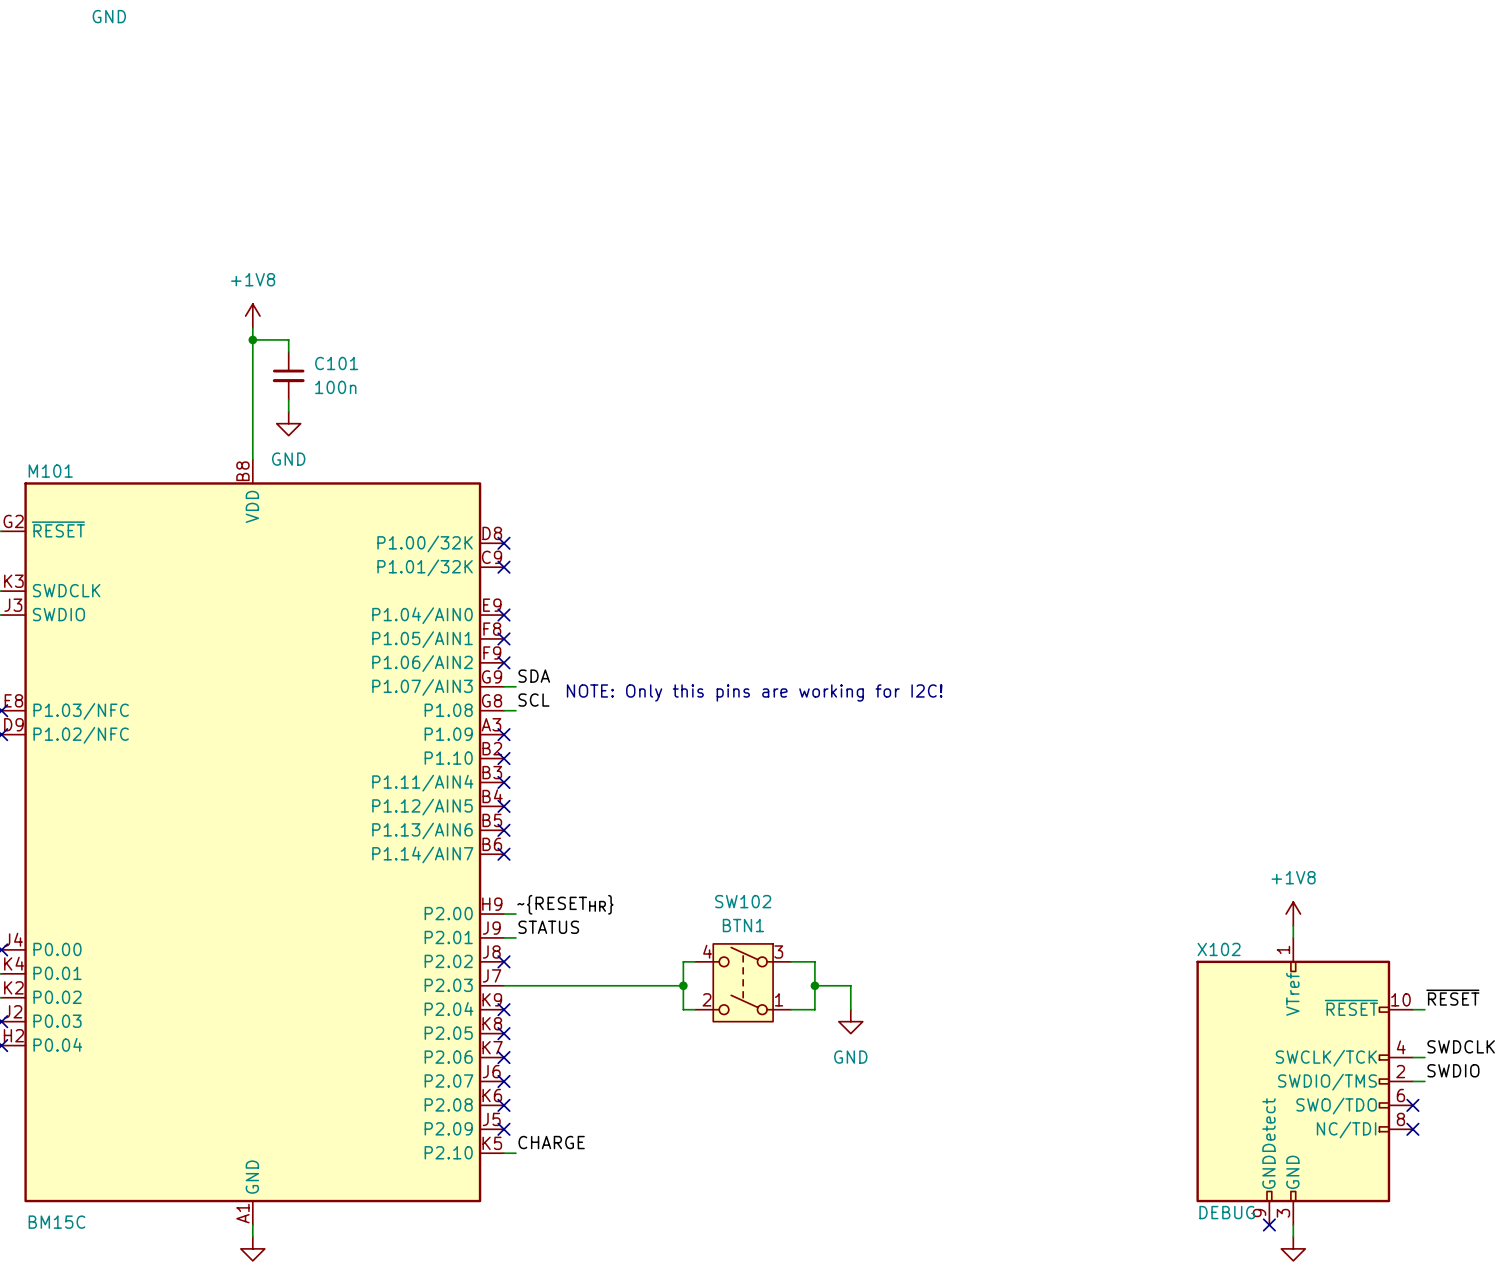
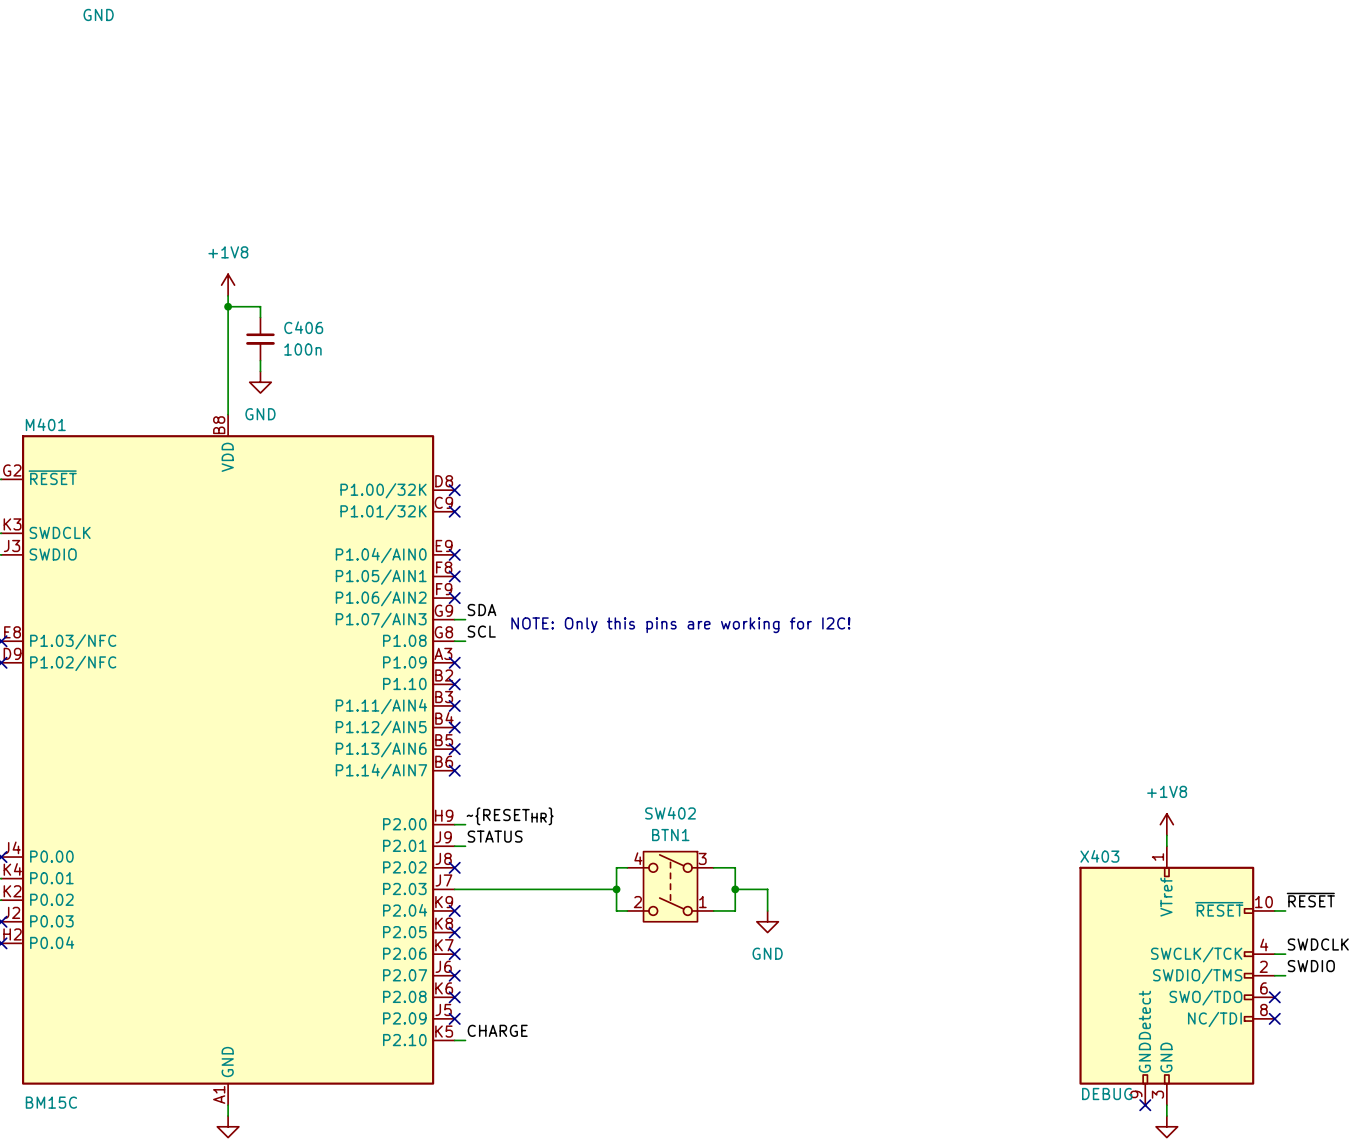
C101 name: C101 (336, 363) -> C406 (303, 327)
M101 name: M101 (50, 471) -> M401 (45, 424)
SW102 name: SW102 (743, 901) -> SW402 (670, 813)
X102 name: X102 (1219, 949) -> X403 (1099, 856)

